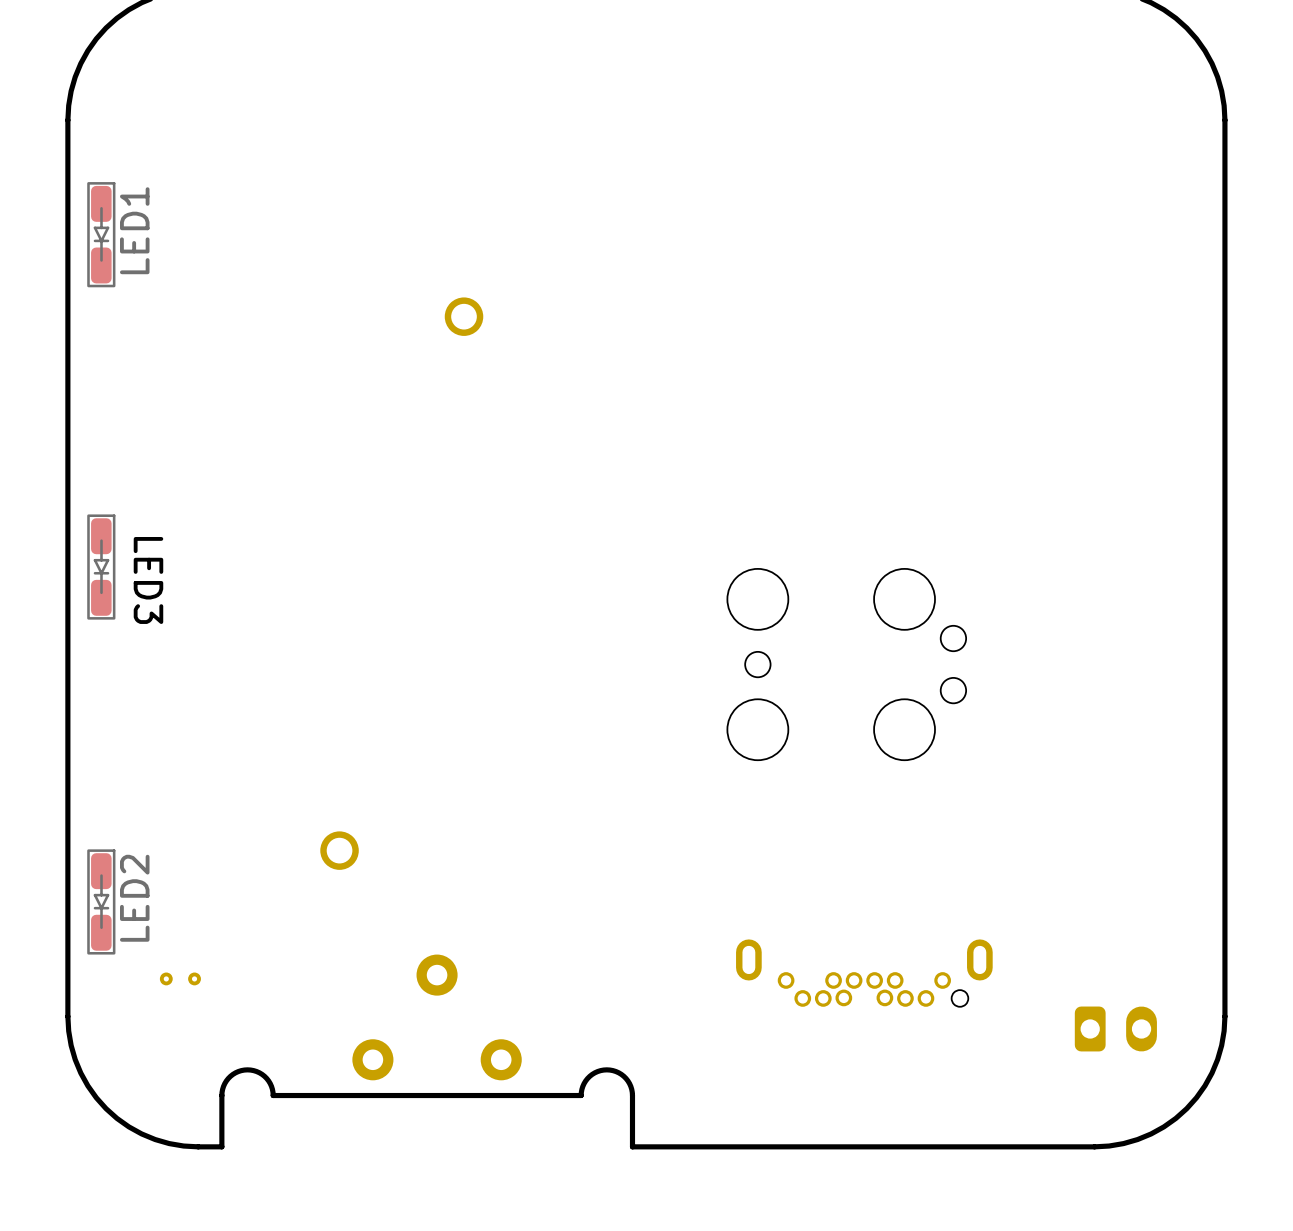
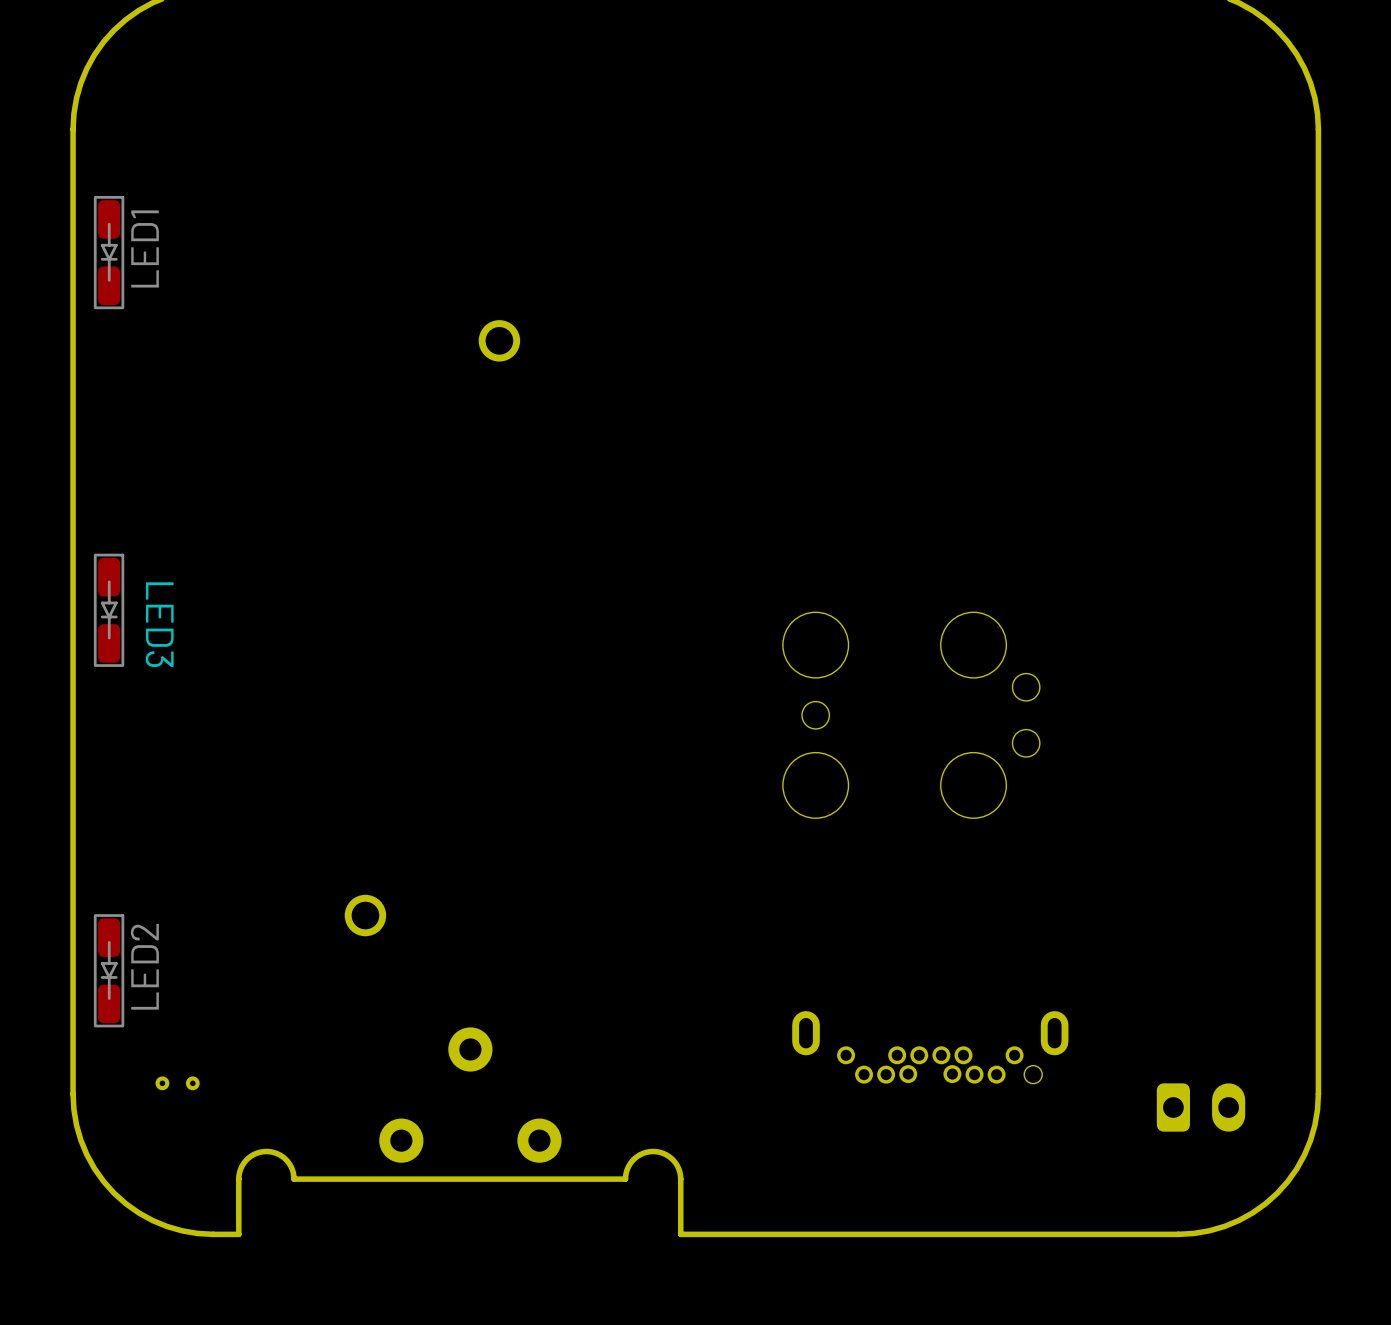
part position: (180, 978) -> (177, 1083)

